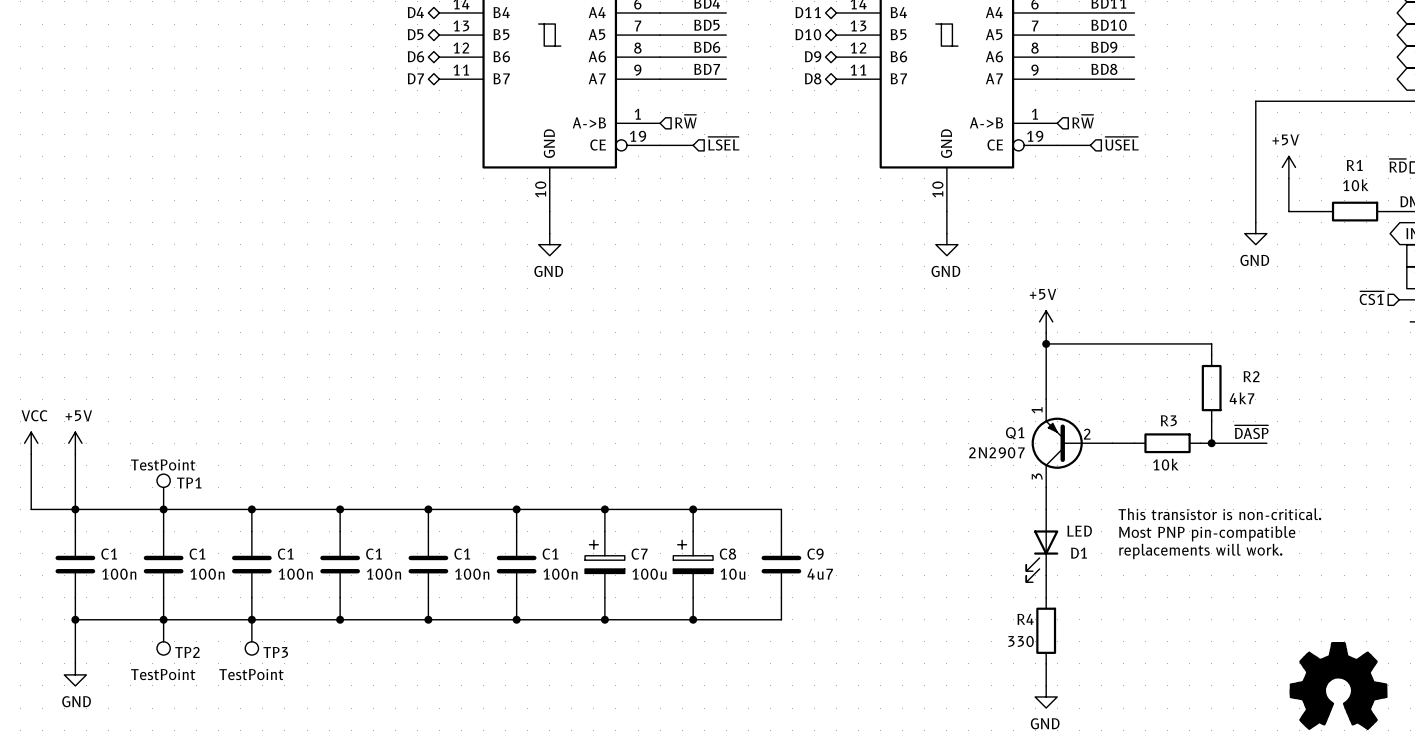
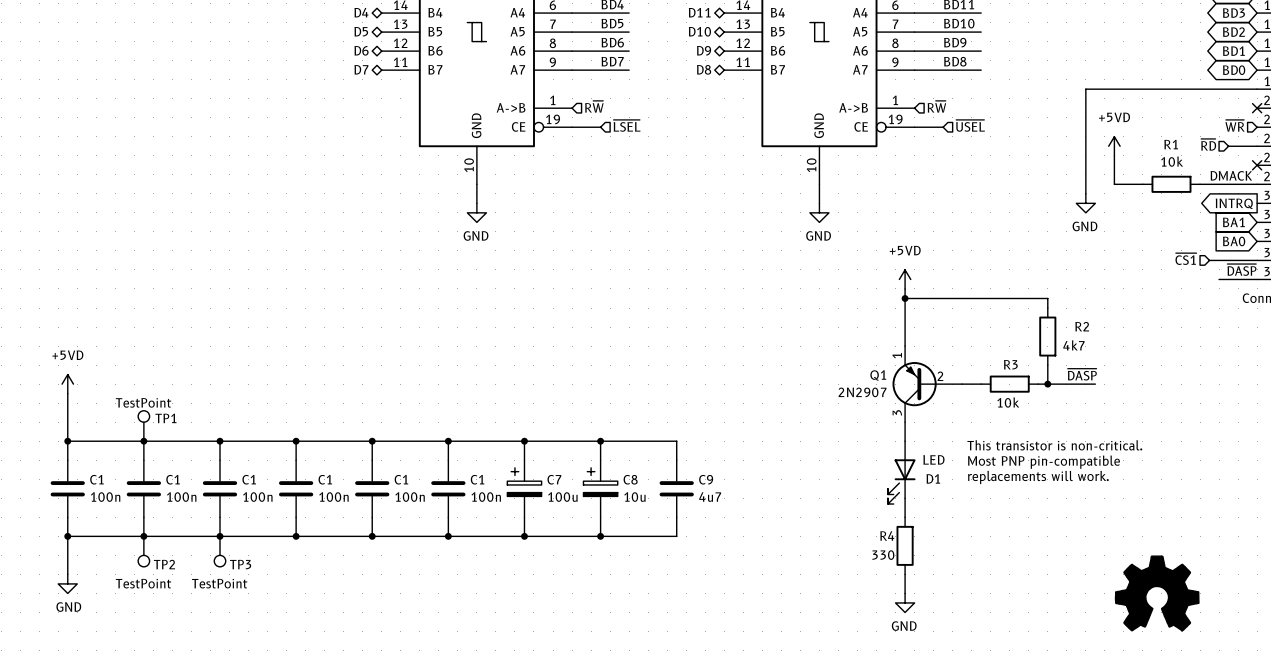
power symbol: +5V (1288, 167) -> +5VD (1114, 146)
power symbol: +5V (1046, 321) -> +5VD (905, 279)
power symbol: VCC (31, 443) -> none
power symbol: +5V (75, 443) -> +5VD (67, 384)
wire: (31, 454) (31, 509) (75, 509) -> none

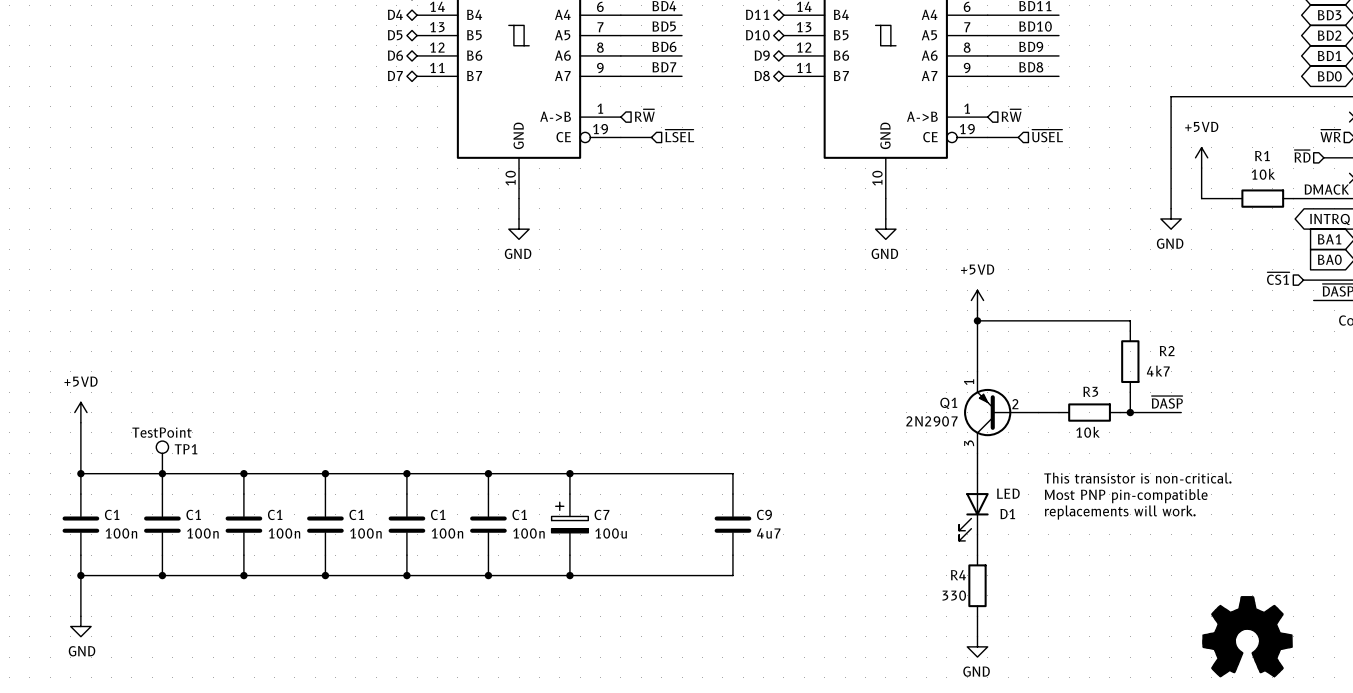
wire: (600, 441) (600, 460) -> none
junction: (600, 441) -> none
C8: 10u (600, 488) -> none
wire: (600, 517) (600, 536) -> none
junction: (600, 536) -> none
TP2: TestPoint (143, 551) -> none
TP3: TestPoint (220, 551) -> none

